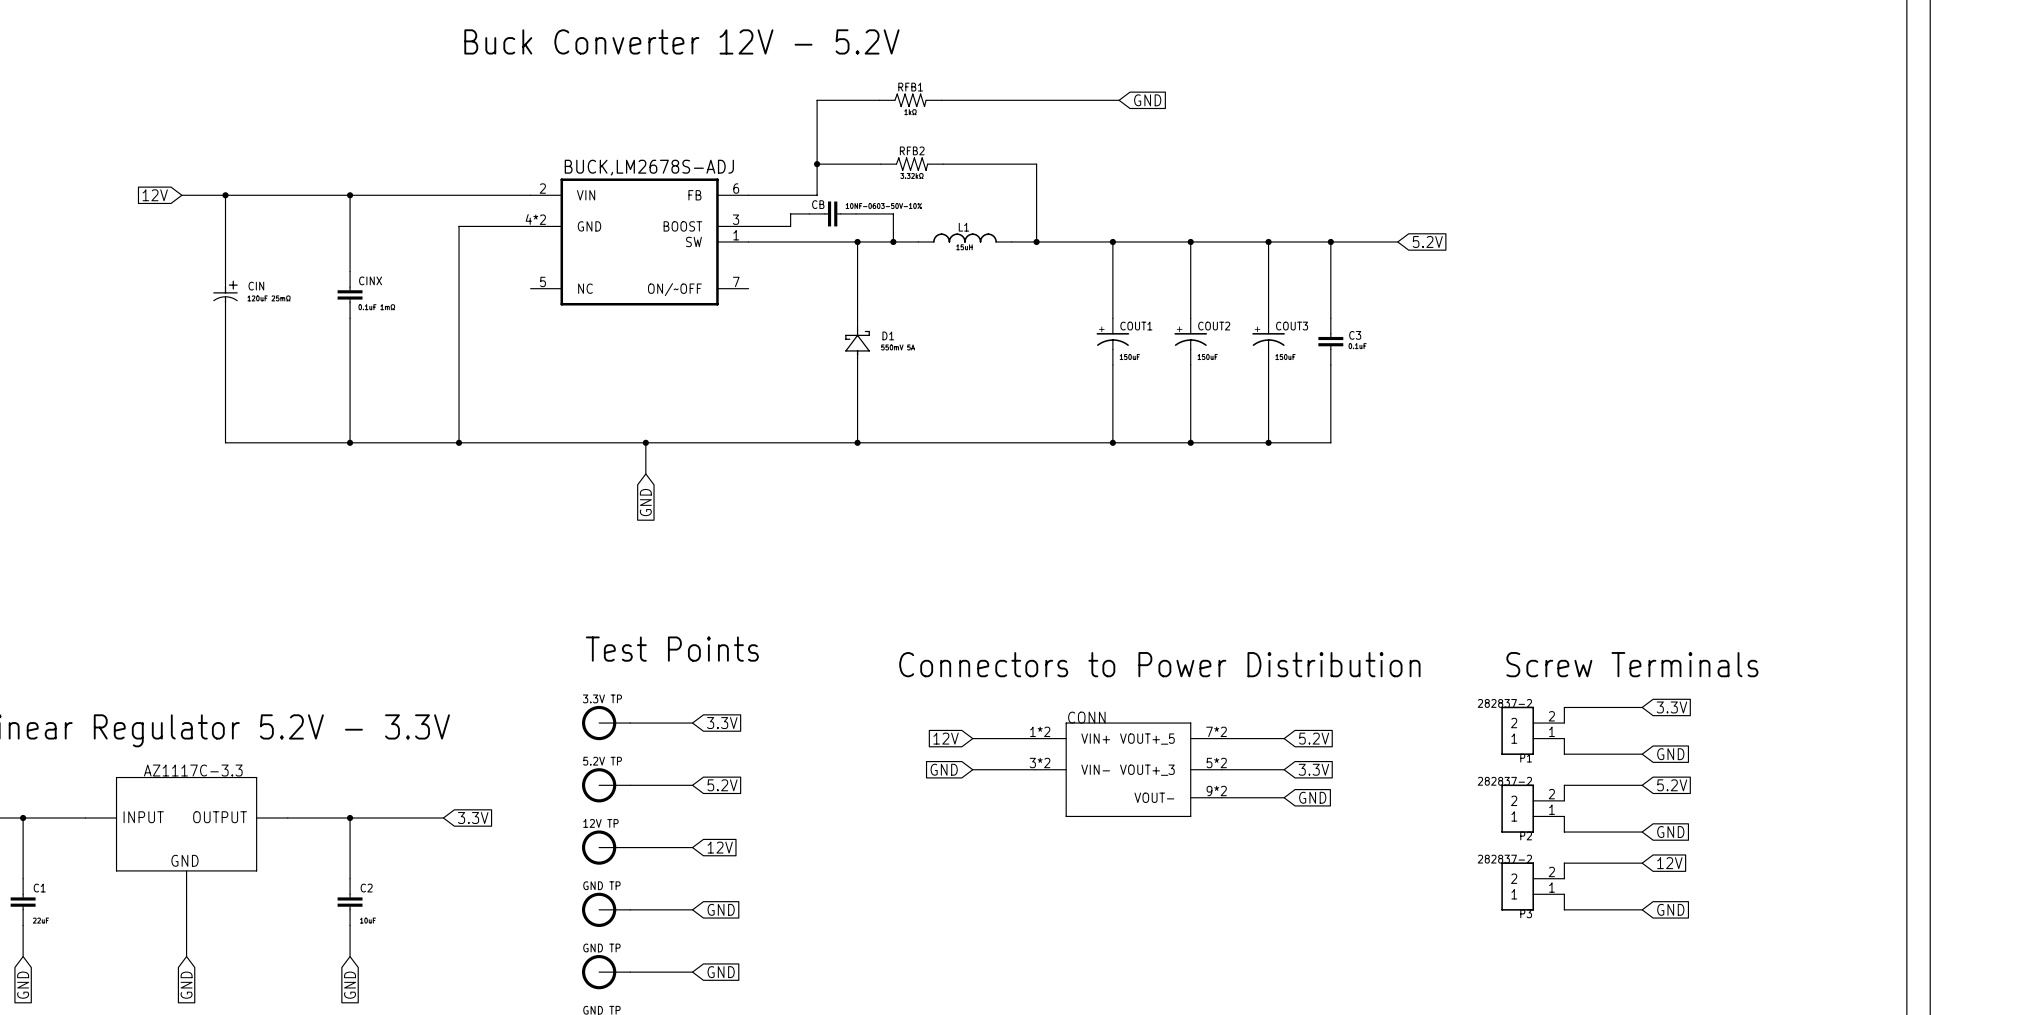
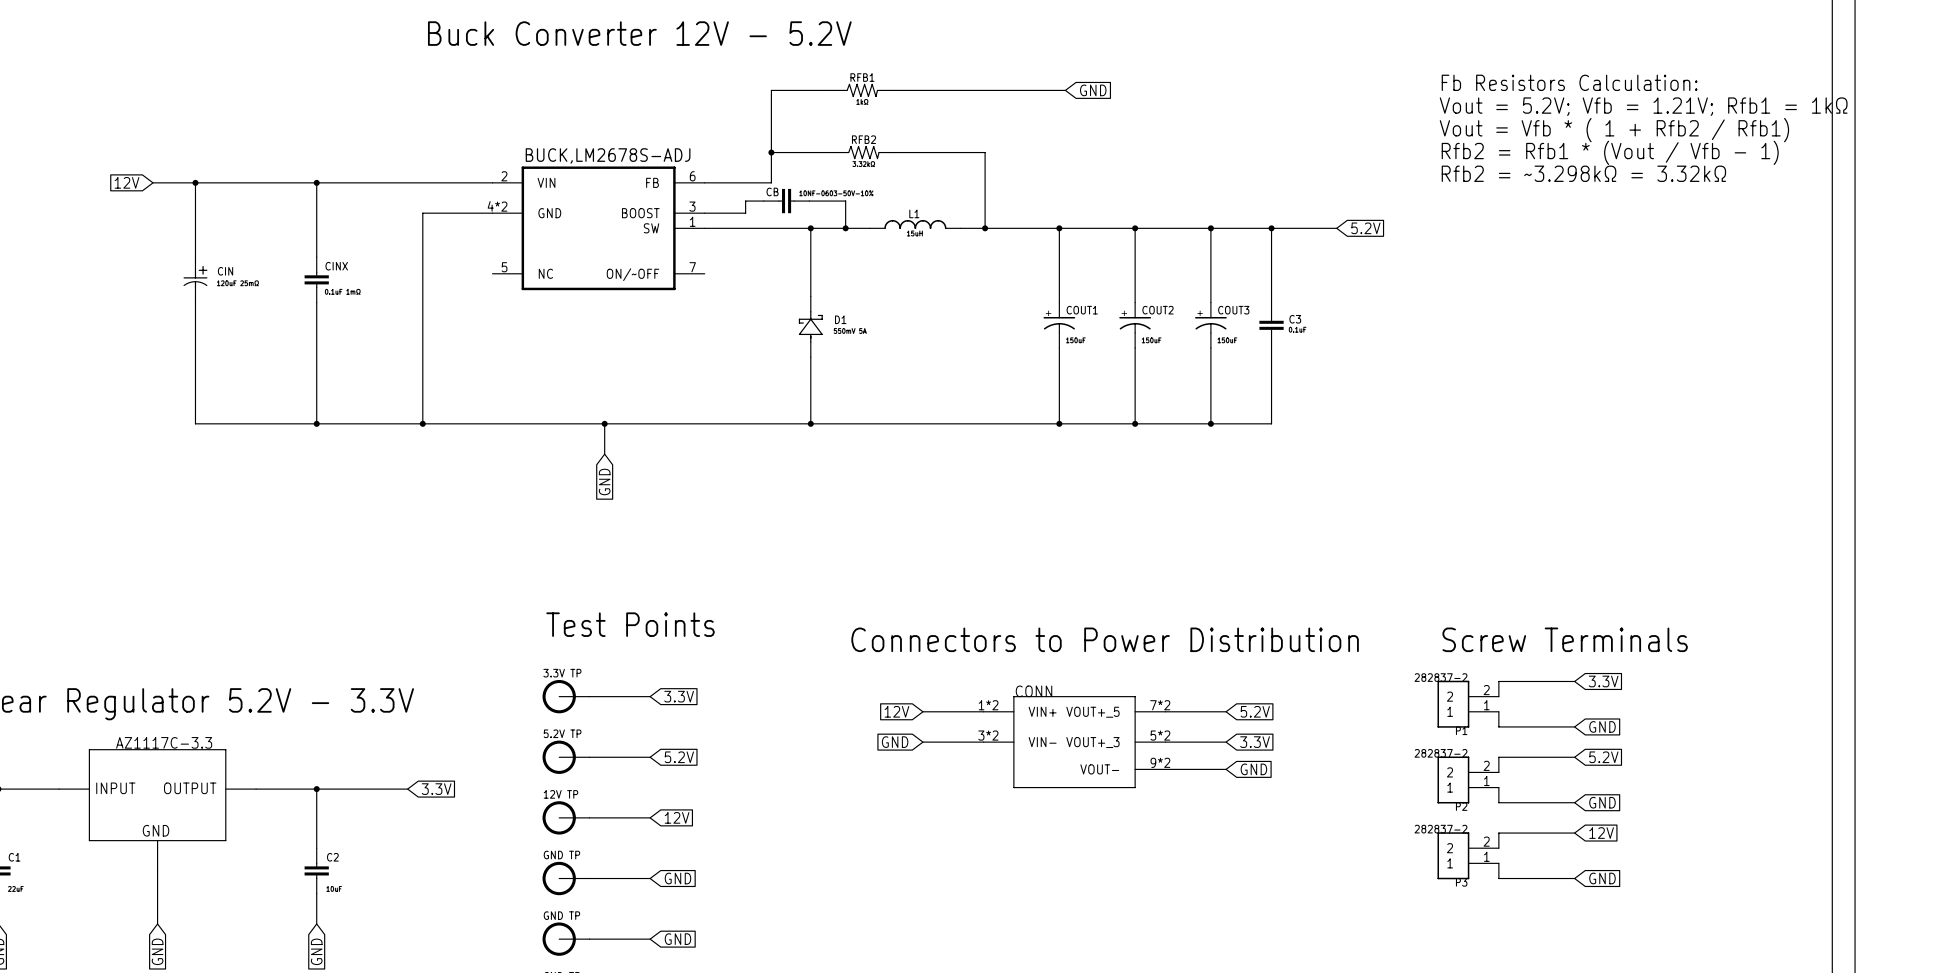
text: none -> Fb Resistors Calculation: (1569, 82)
text: none -> Vout = 5.2V; Vfb = 1.21V; Rfb1 = 1kΩ (1643, 106)
text: none -> Vout = Vfb * ( 1 + Rfb2 / Rfb1) (1614, 130)
text: none -> Rfb2 = Rfb1 * (Vout / Vfb - 1) (1610, 152)
text: none -> Rfb2 = ~3.298kΩ = 3.32kΩ (1583, 173)

